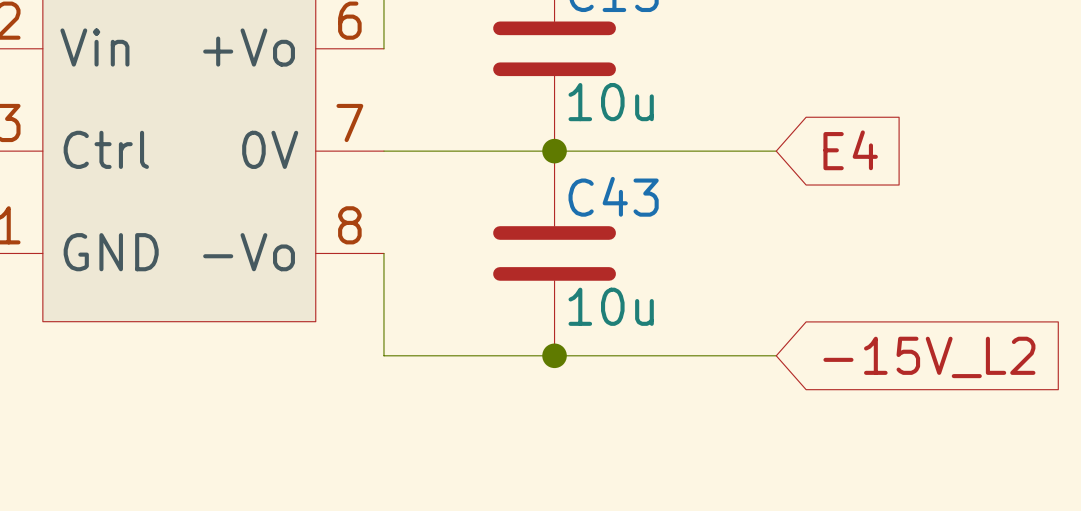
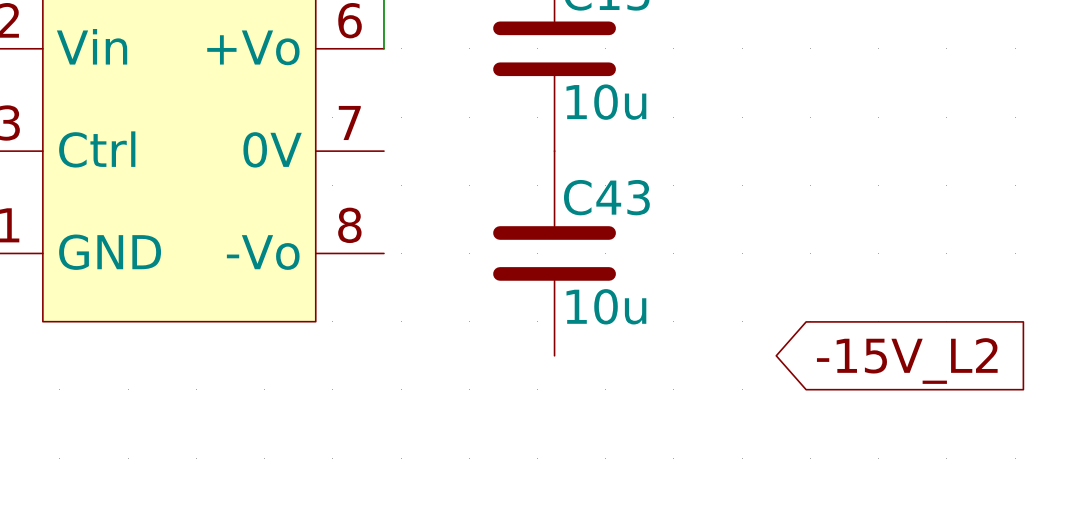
global label: E4 (850, 150) -> none
wire: (383, 151) (776, 151) -> none
junction: (554, 151) -> none
wire: (383, 253) (383, 355) (776, 355) -> none
junction: (554, 355) -> none

